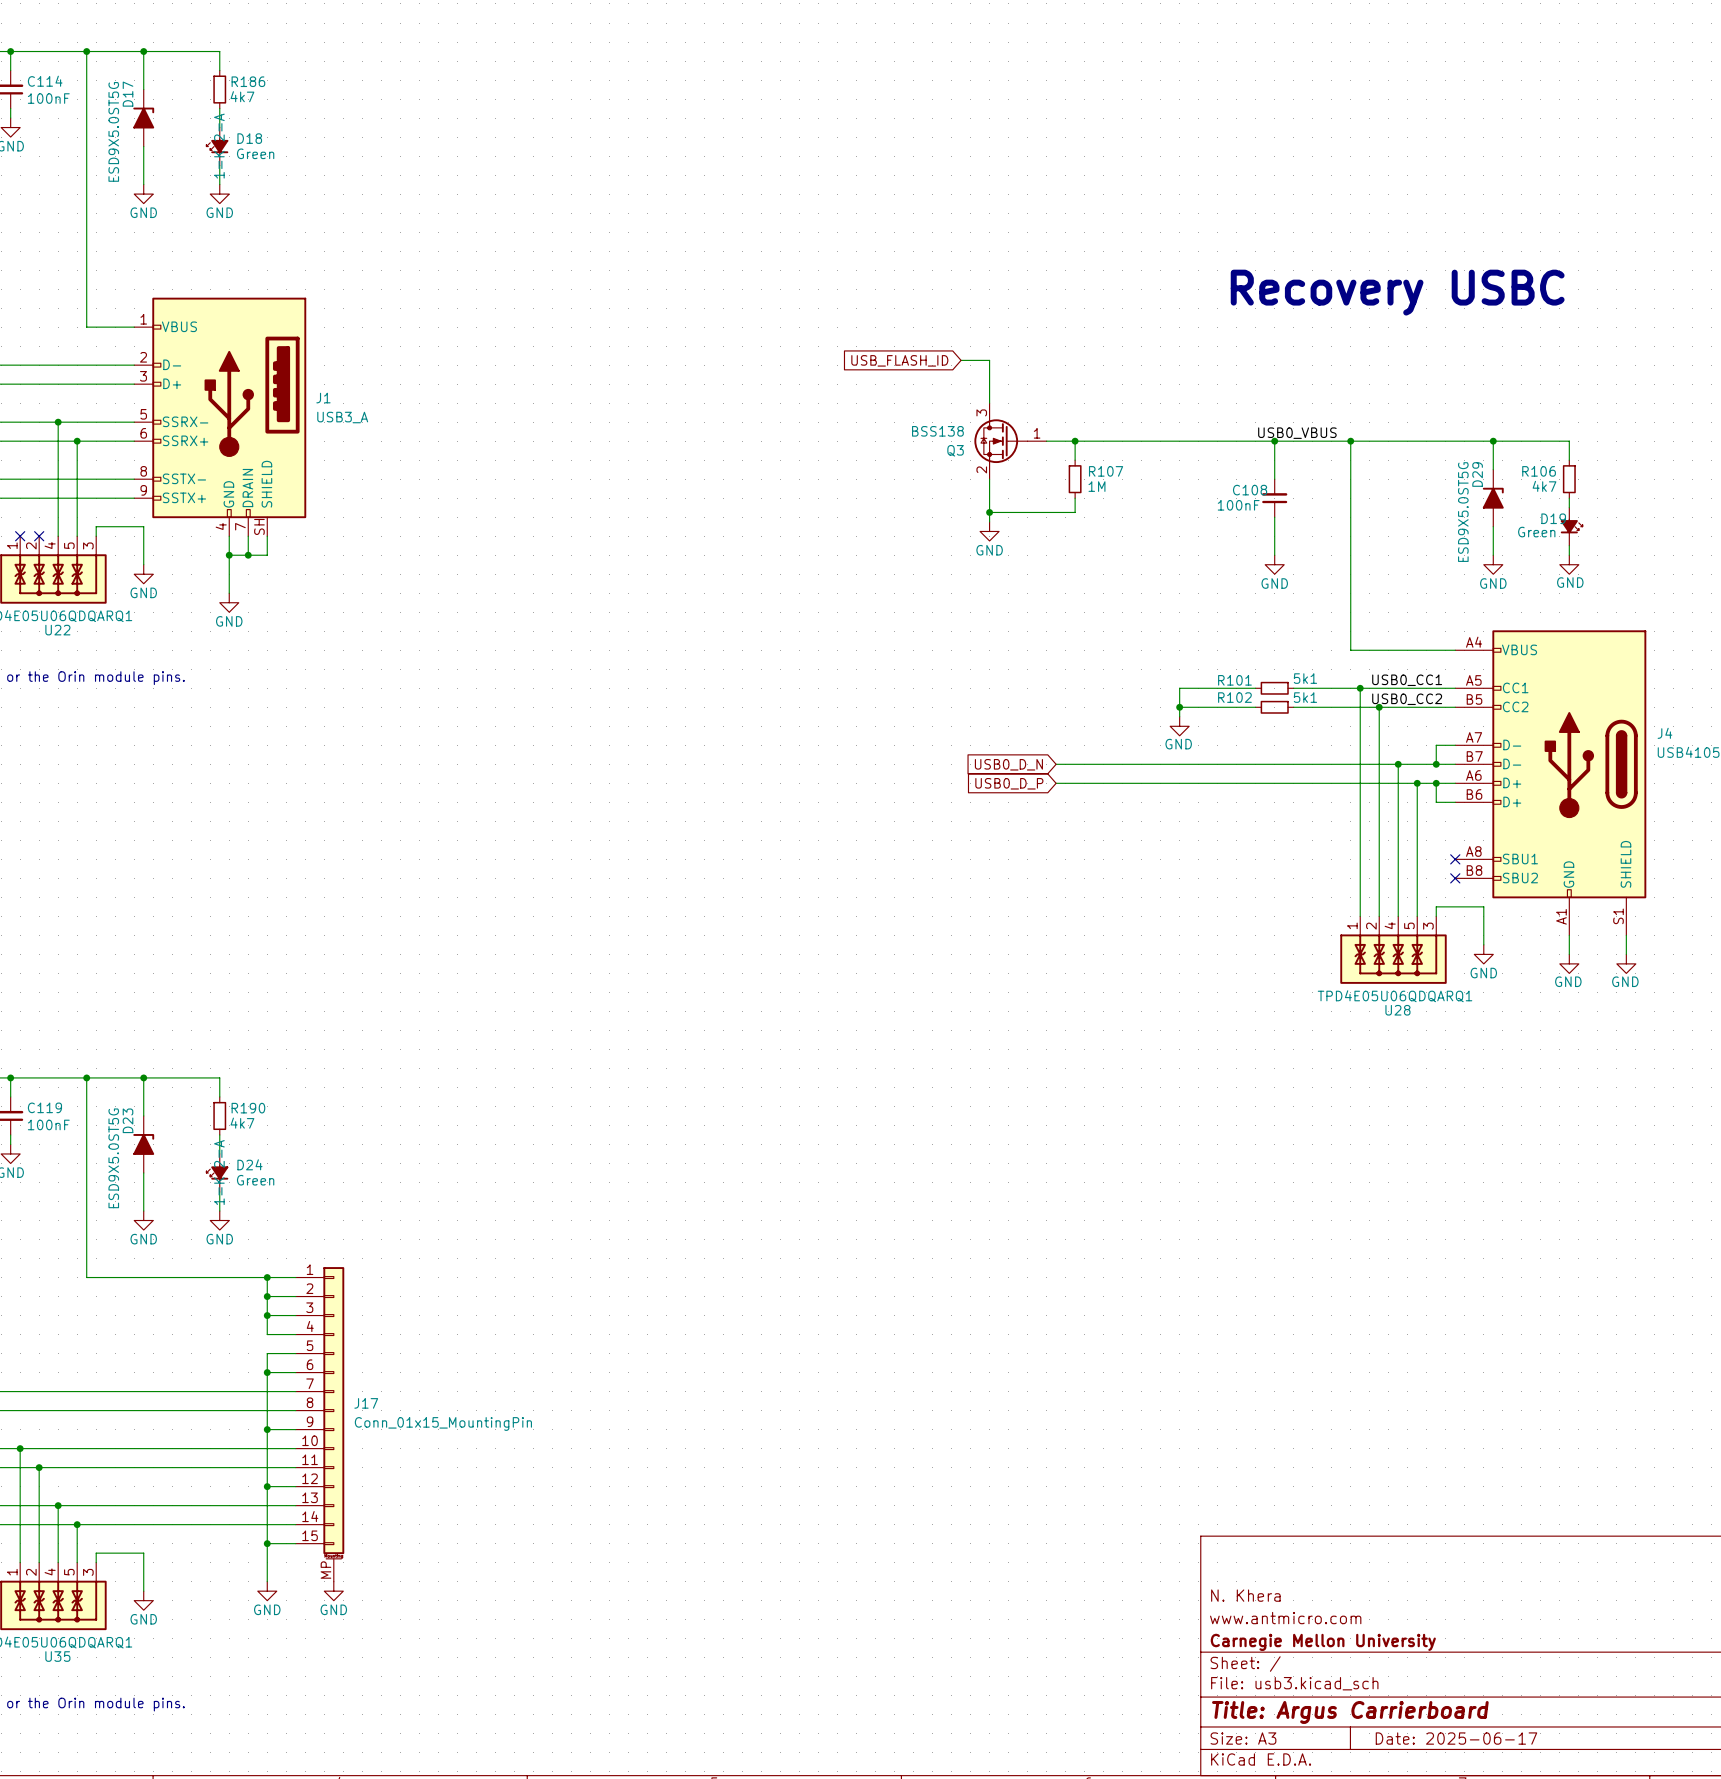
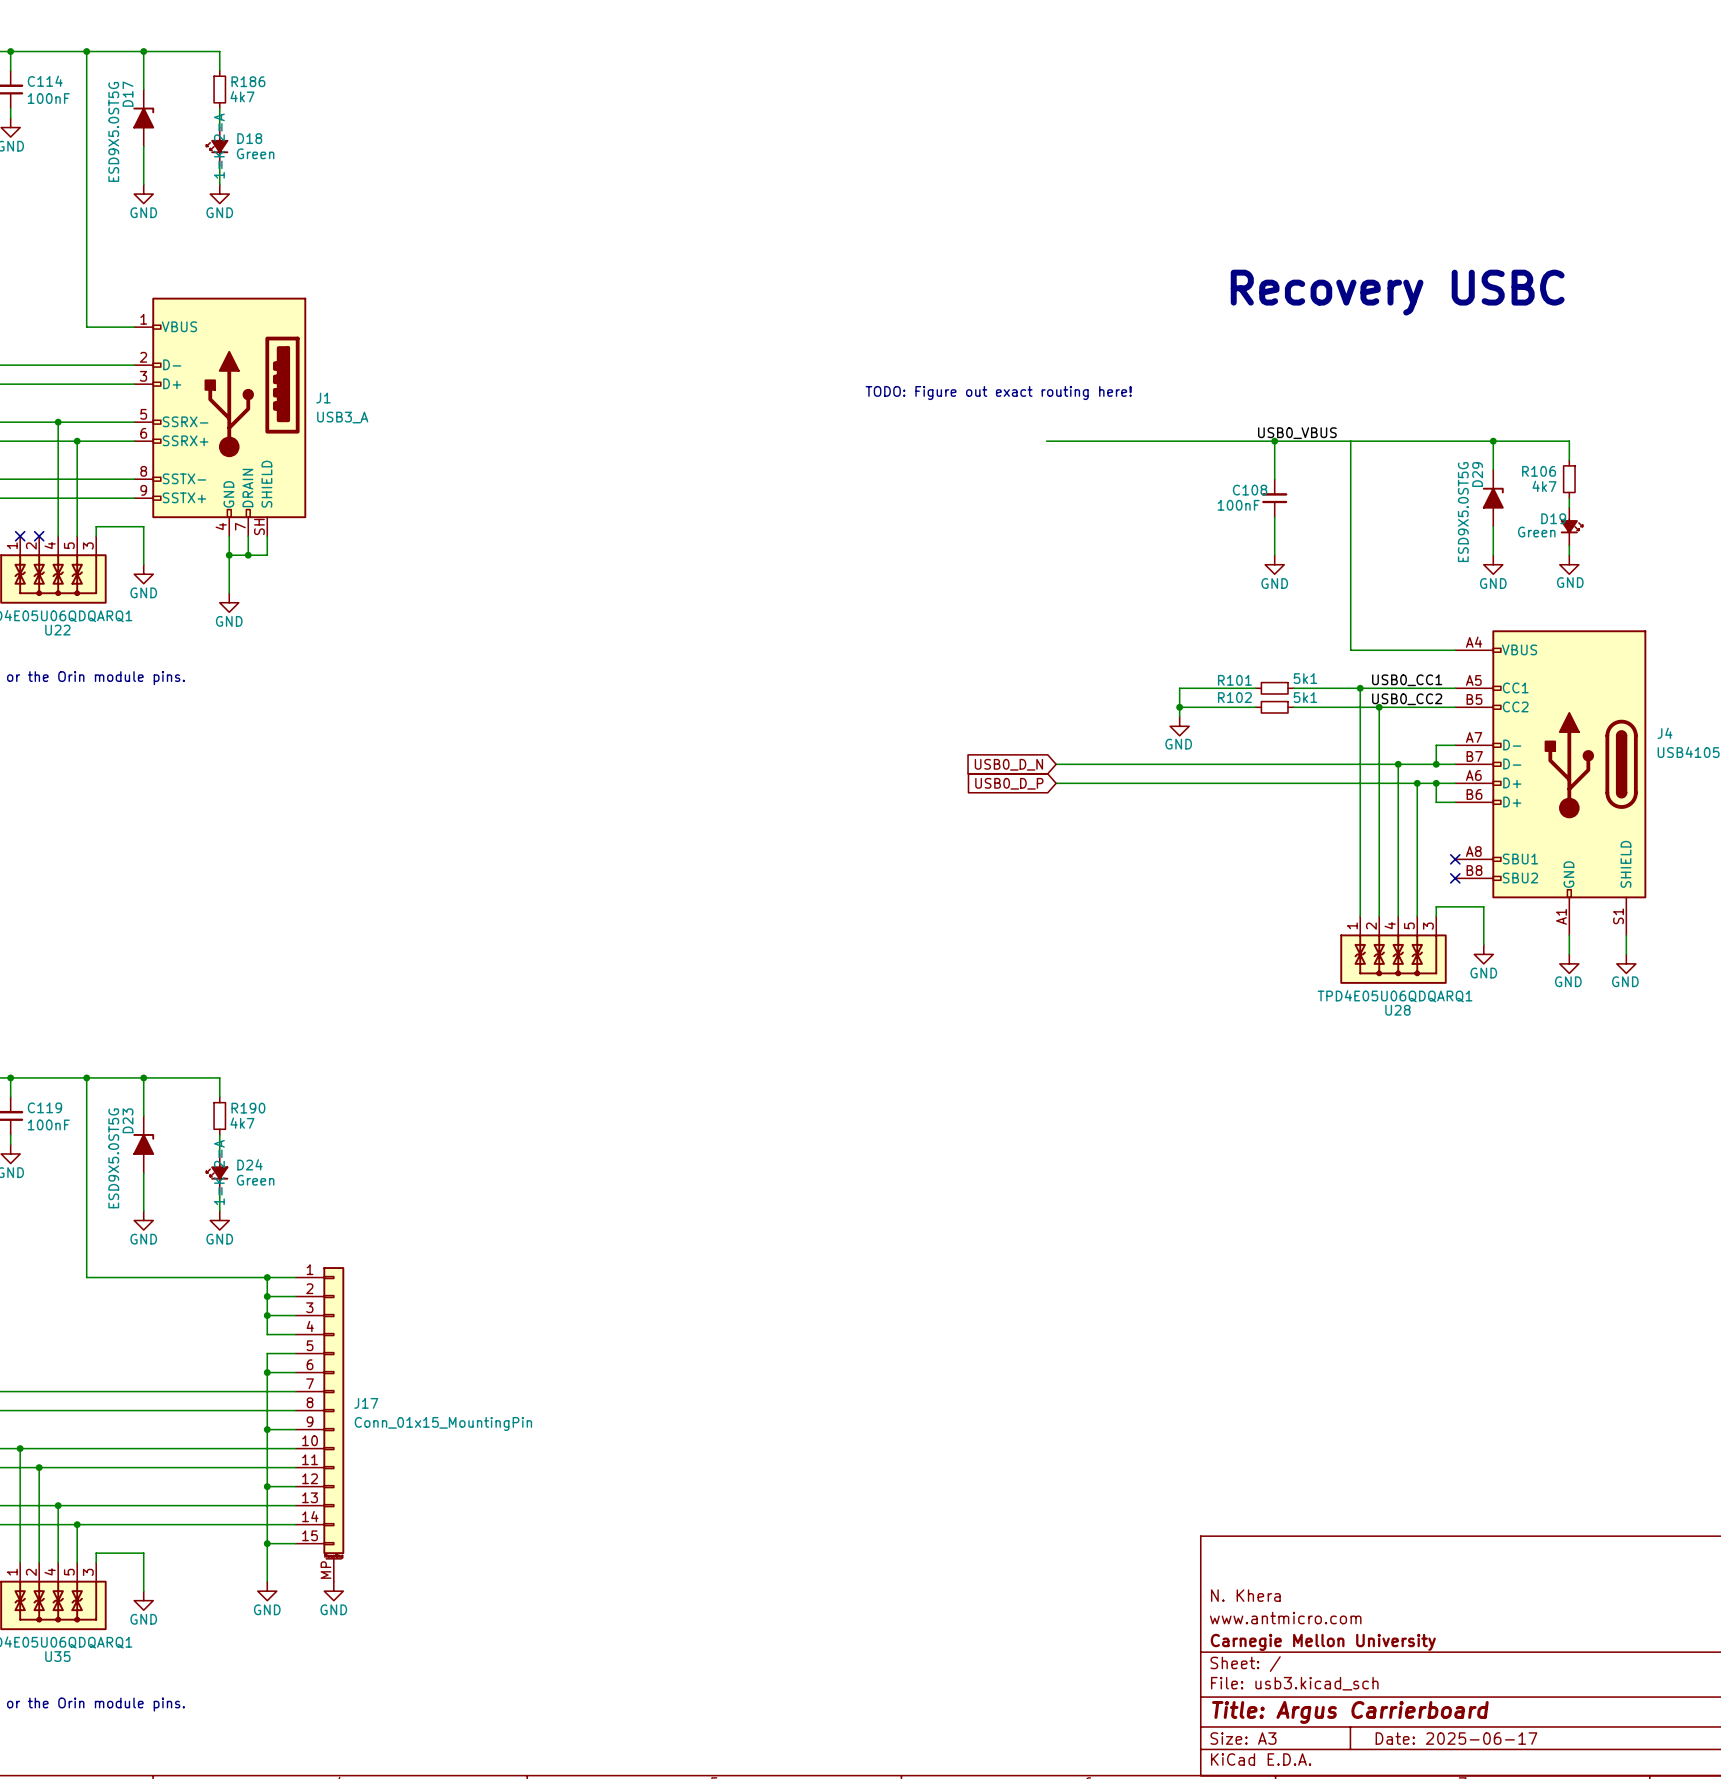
global label: USB_FLASH_ID (899, 360) -> none
wire: (961, 360) (989, 360) (989, 403) -> none
text: none -> TODO: Figure out exact routing here! (998, 393)
Q3: BSS138 (1010, 441) -> none
wire: (1075, 441) (1075, 460) -> none
junction: (1075, 441) -> none
junction: (1350, 441) -> none
wire: (989, 479) (989, 521) -> none
R107: 1M (1075, 479) -> none
wire: (1075, 498) (1075, 512) (989, 512) -> none
junction: (989, 512) -> none
power symbol: GND (989, 531) -> none

